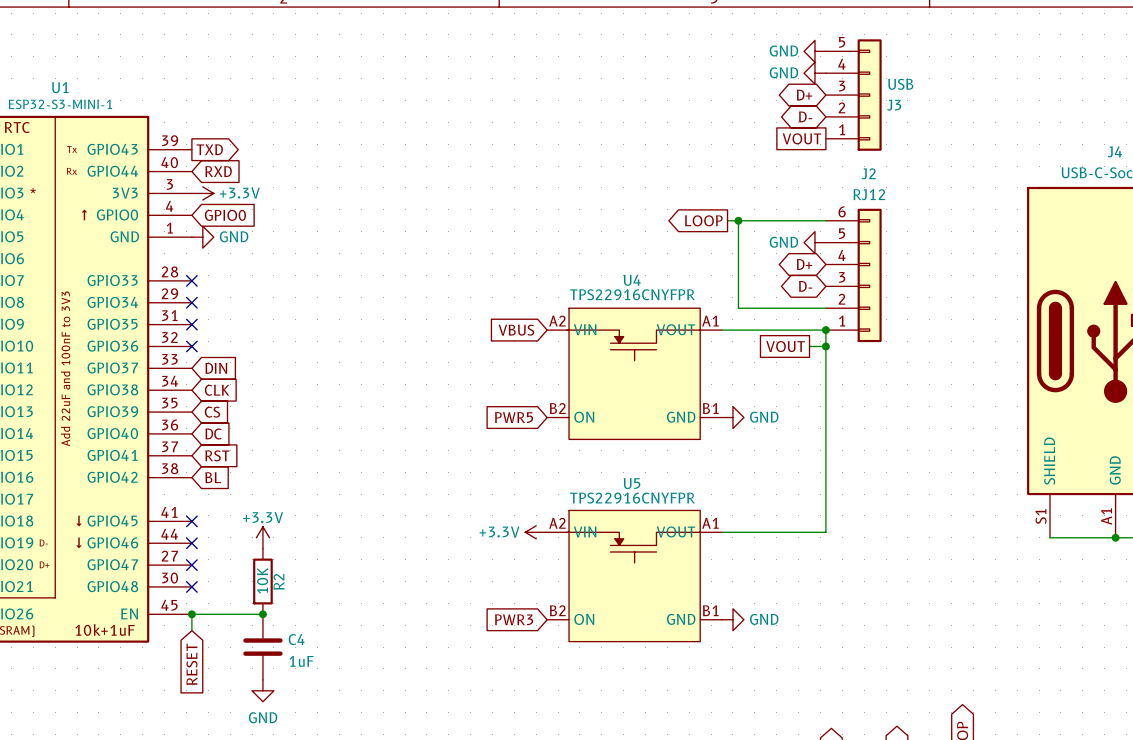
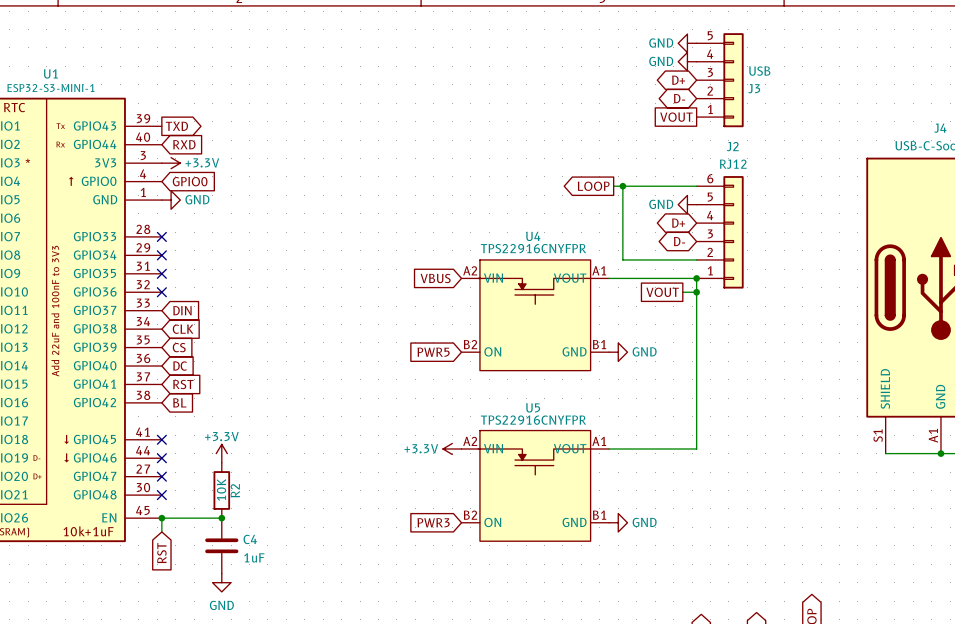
global label: RESET (191, 664) -> RST (161, 553)

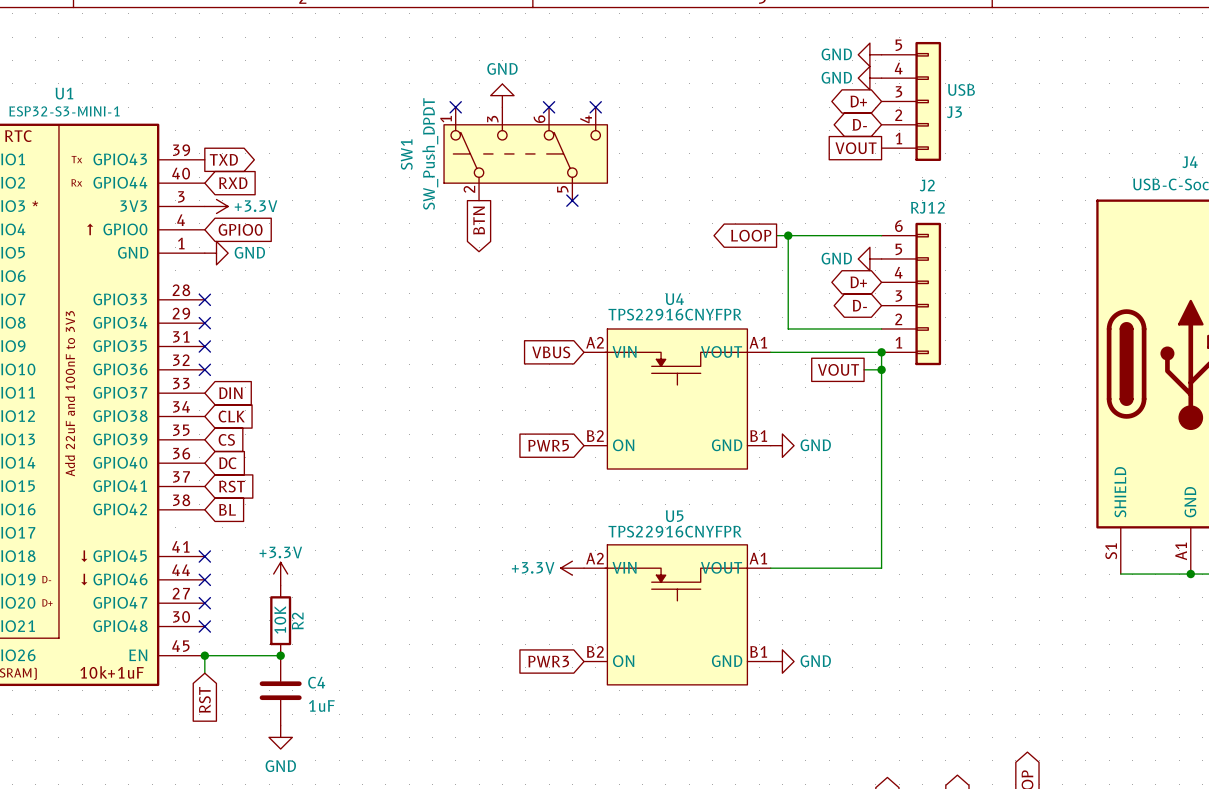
power symbol: none -> GND (502, 95)
no-connect mark: none -> (455, 107)
no-connect mark: none -> (549, 107)
no-connect mark: none -> (595, 107)
SW1: none -> SW_Push_DPDT (525, 153)
no-connect mark: none -> (572, 200)
global label: none -> BTN (479, 220)

